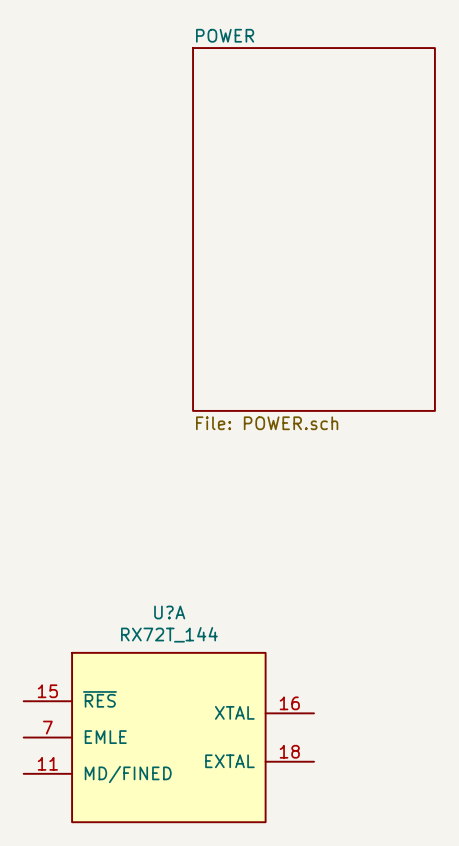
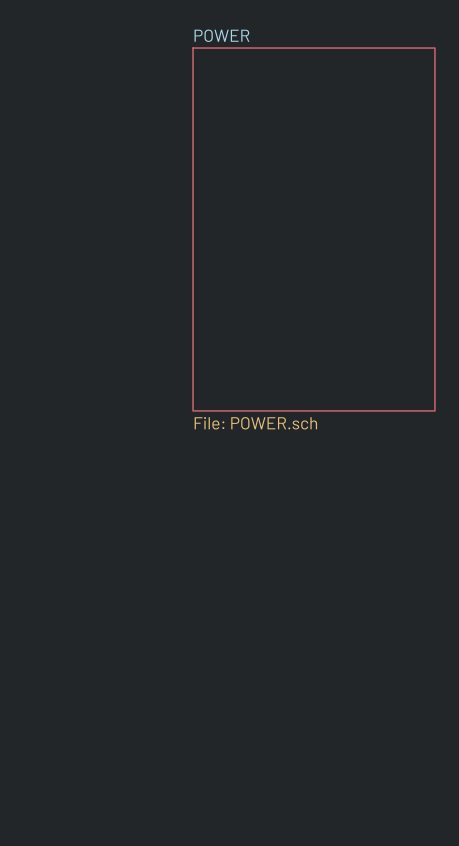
U?A: RX72T_144 (168, 737) -> none

